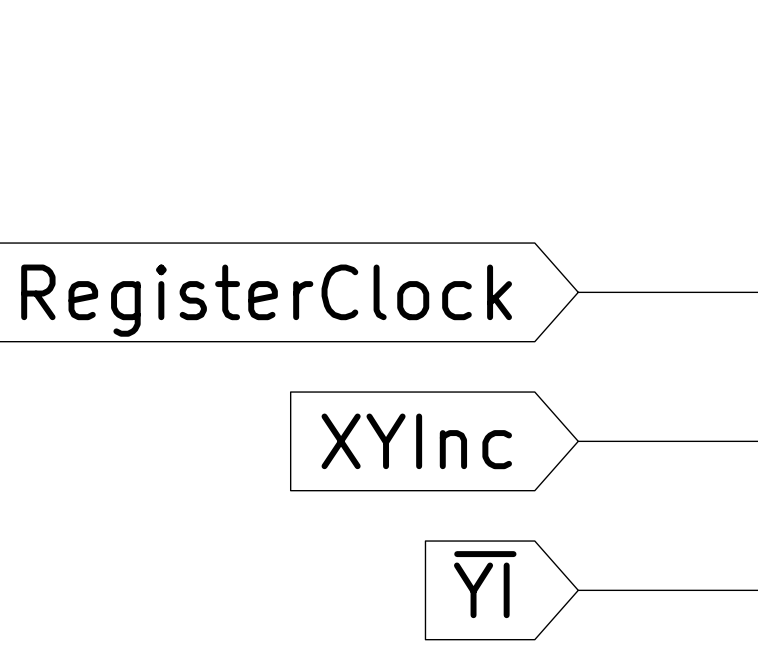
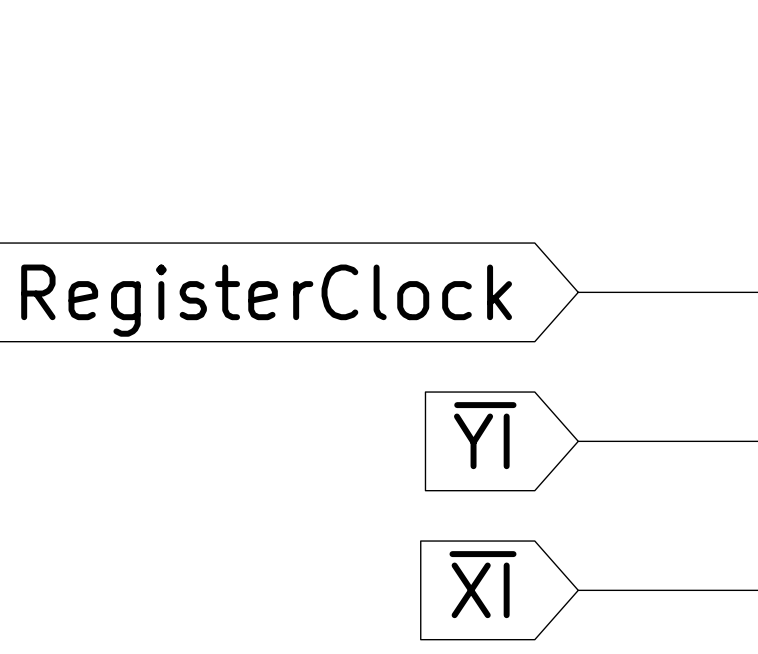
global label: XYInc (416, 441) -> ~{YI} (485, 435)
global label: ~{YI} (485, 584) -> ~{XI} (483, 584)

